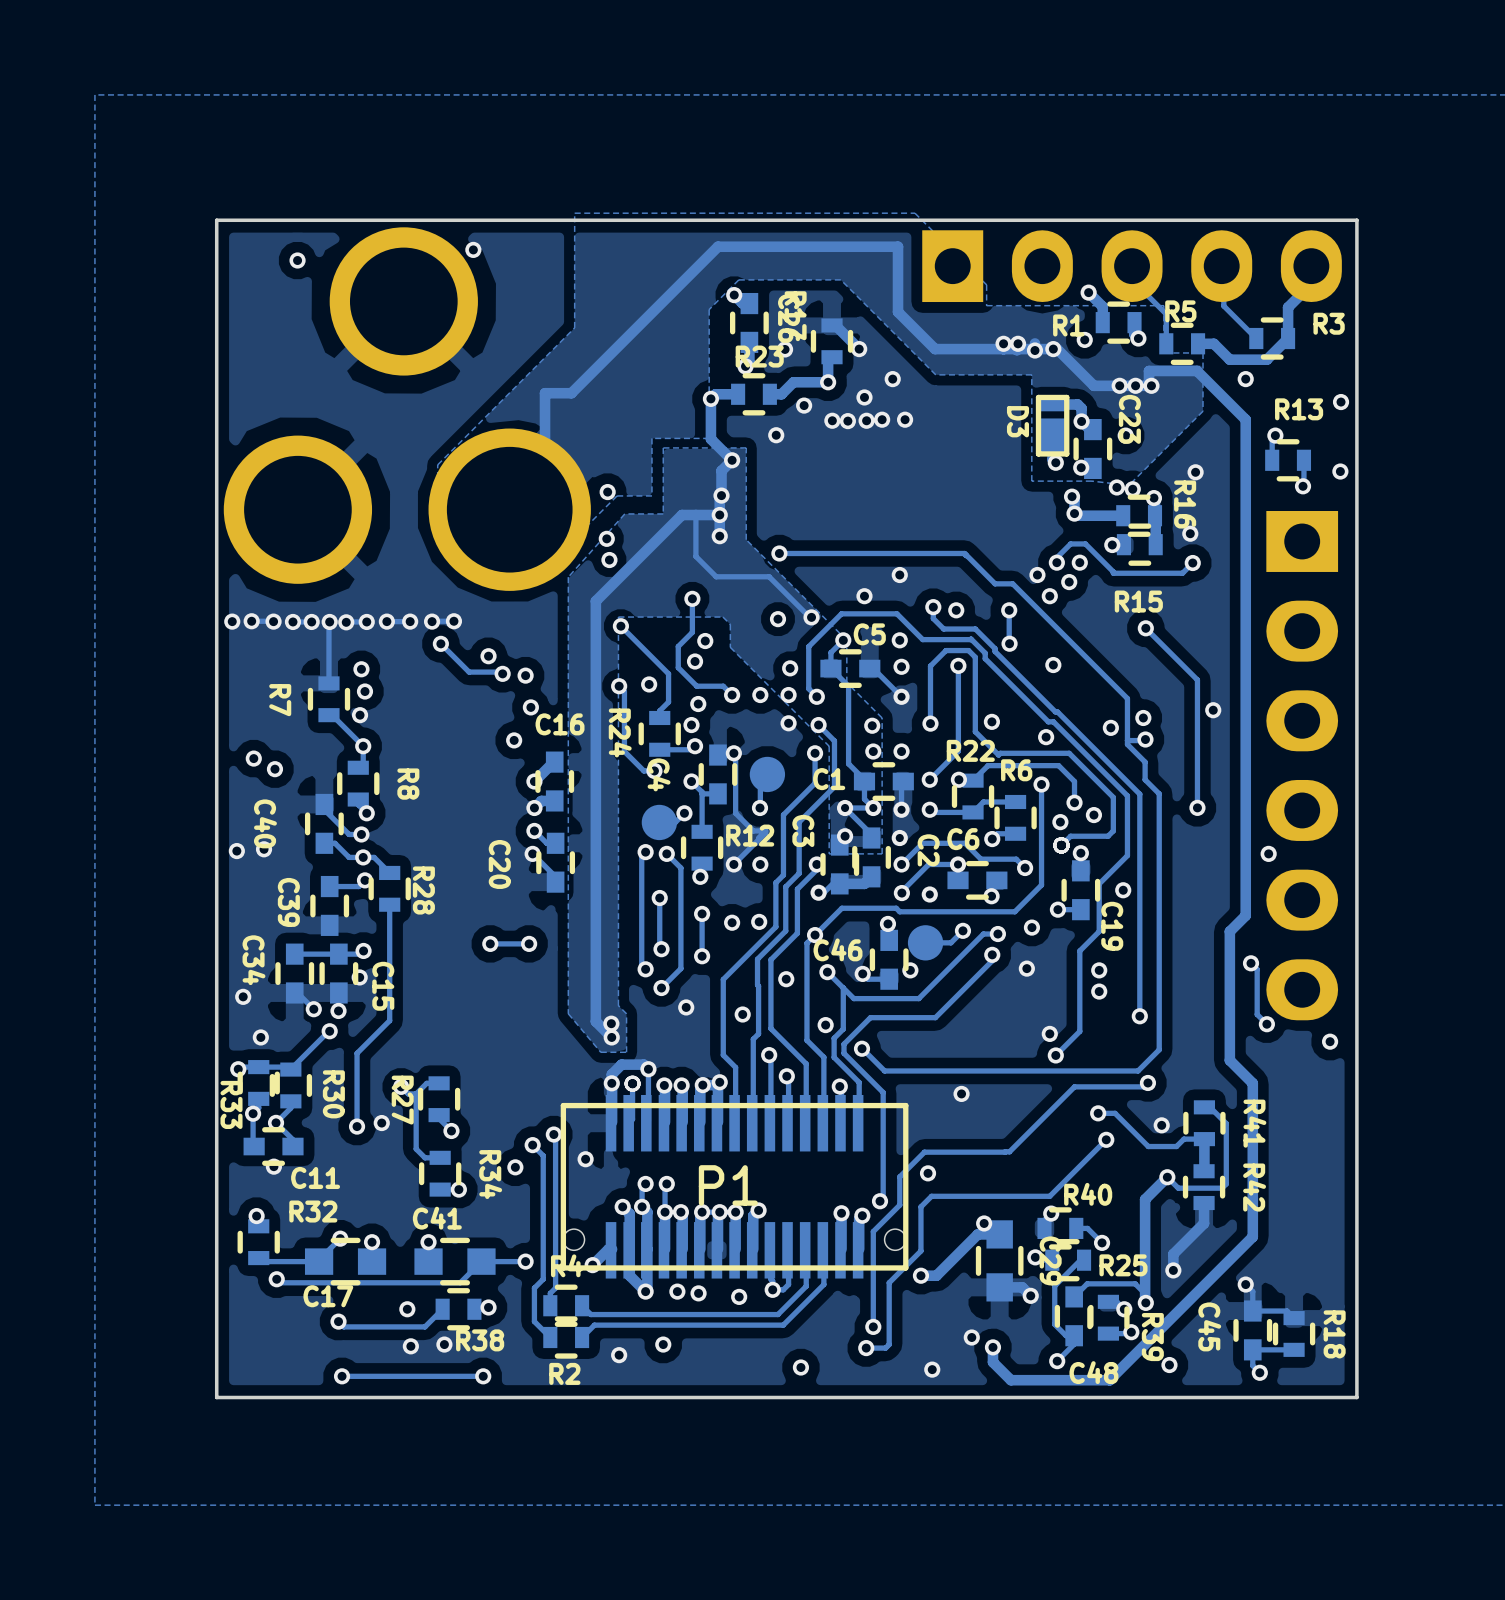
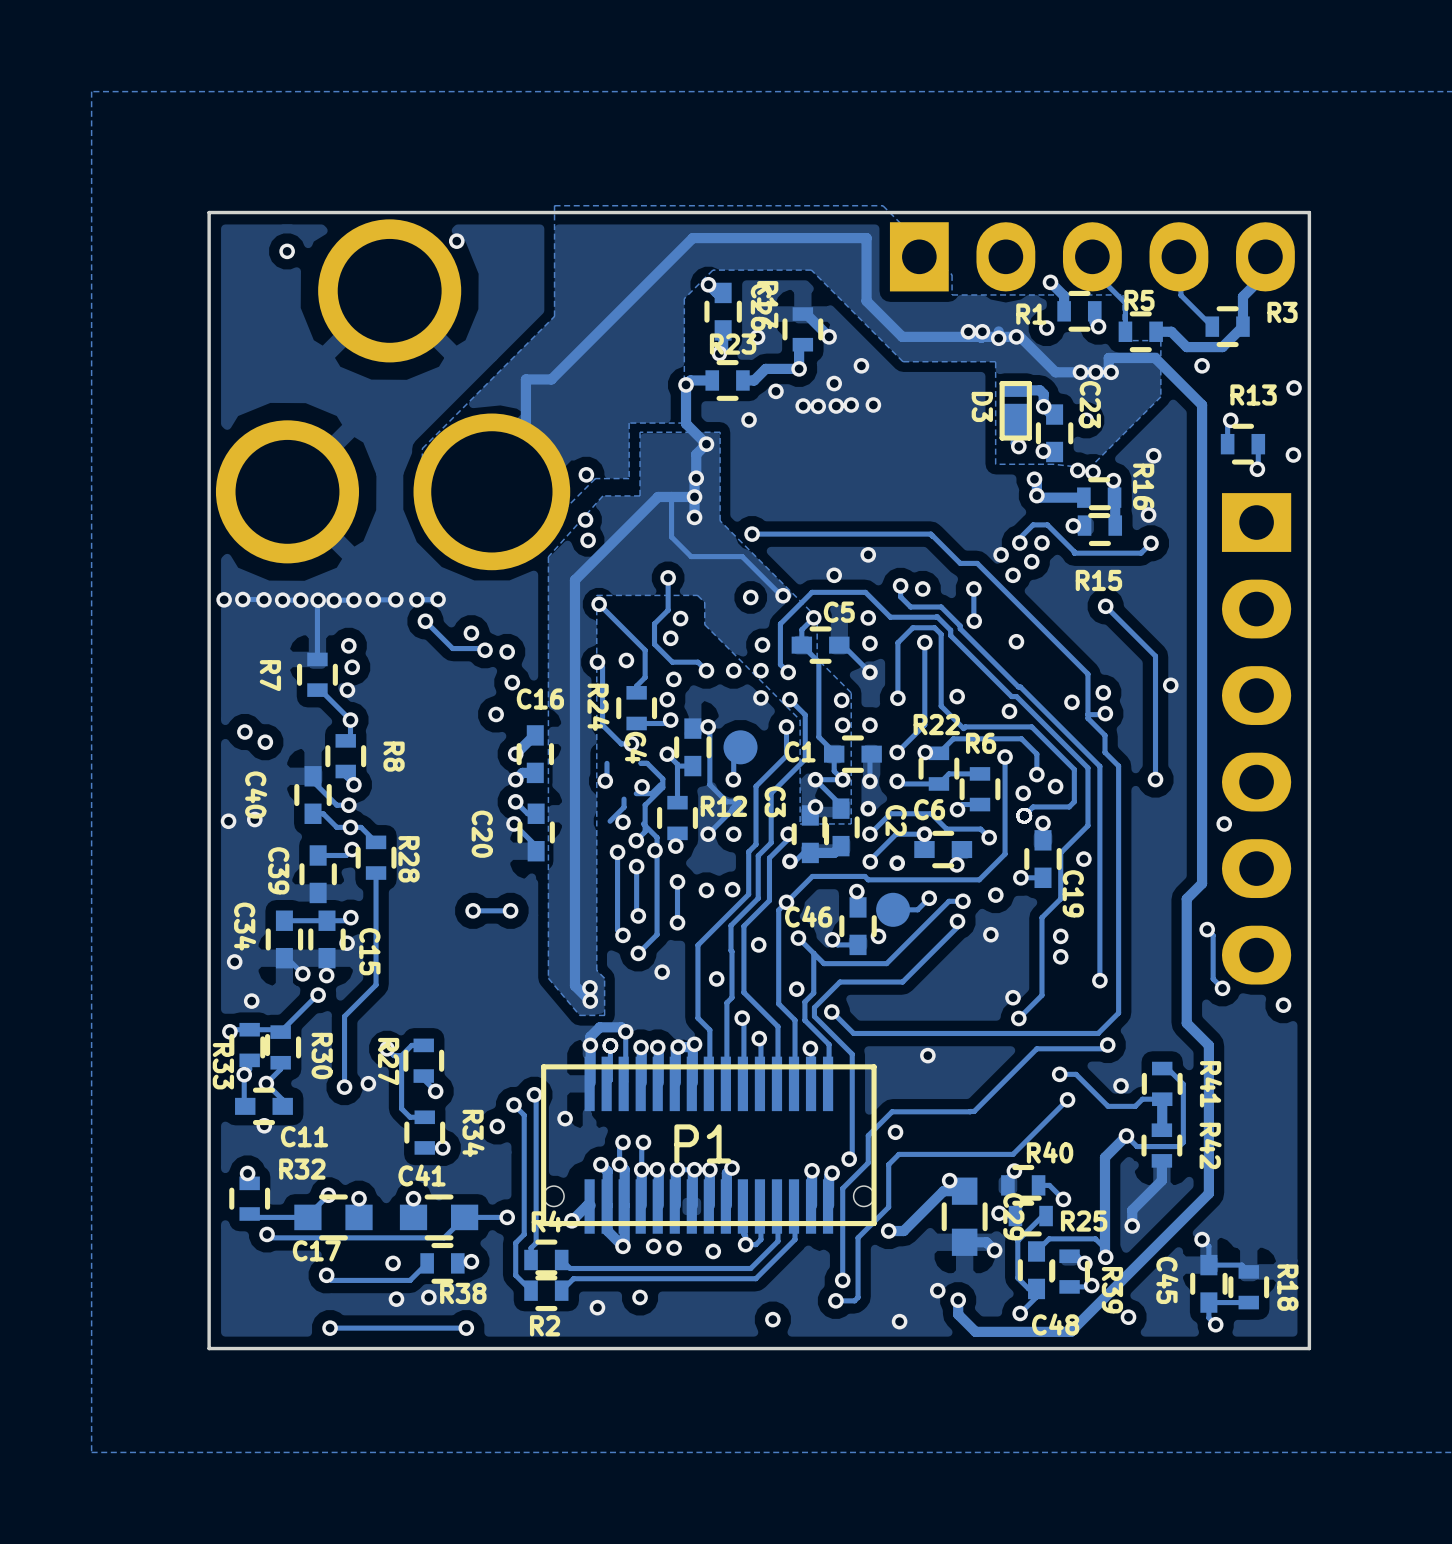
track: none -> (606, 763) (605, 781)
track: none -> (641, 763) (647, 763) (662, 779) (662, 787) (645, 804)
via: none -> (605, 781)
via: (684, 813) -> none
via: none -> (642, 786)
part: (659, 822) -> none
track: none -> (624, 799) (624, 807) (610, 821)
track: none -> (645, 804) (645, 831) (636, 840)
track: (645, 852) (641, 856) (641, 965) -> (617, 852) (617, 929) (619, 931)
via: (666, 853) -> none
via: none -> (636, 840)
via: none -> (655, 850)
via: none -> (617, 852)

